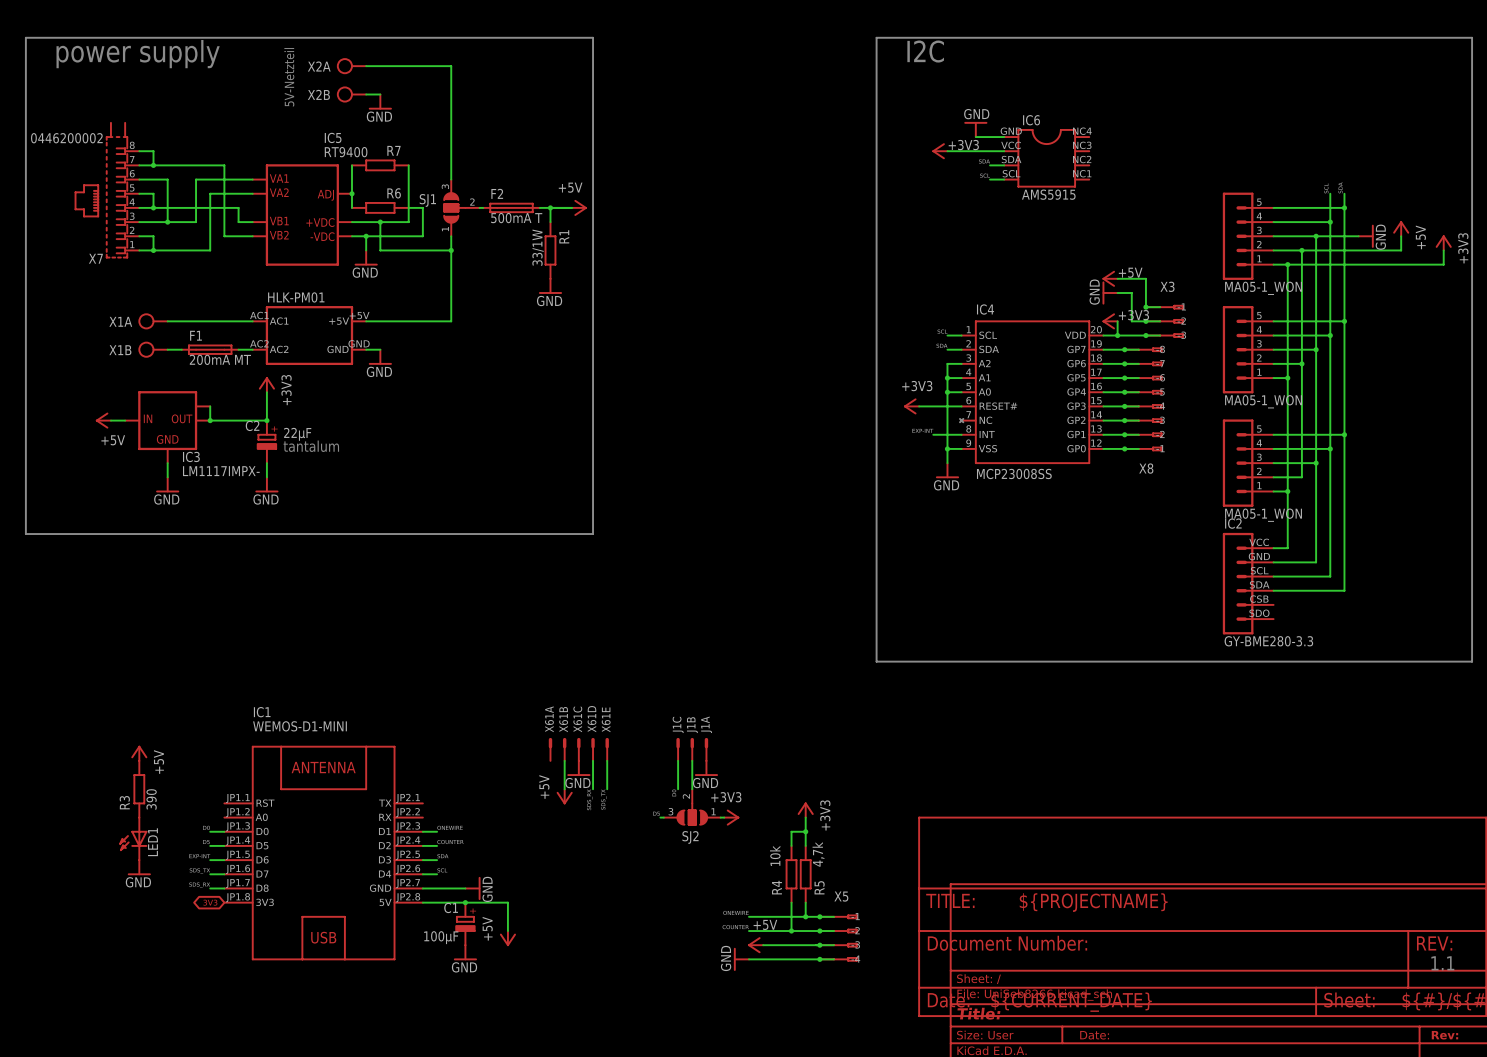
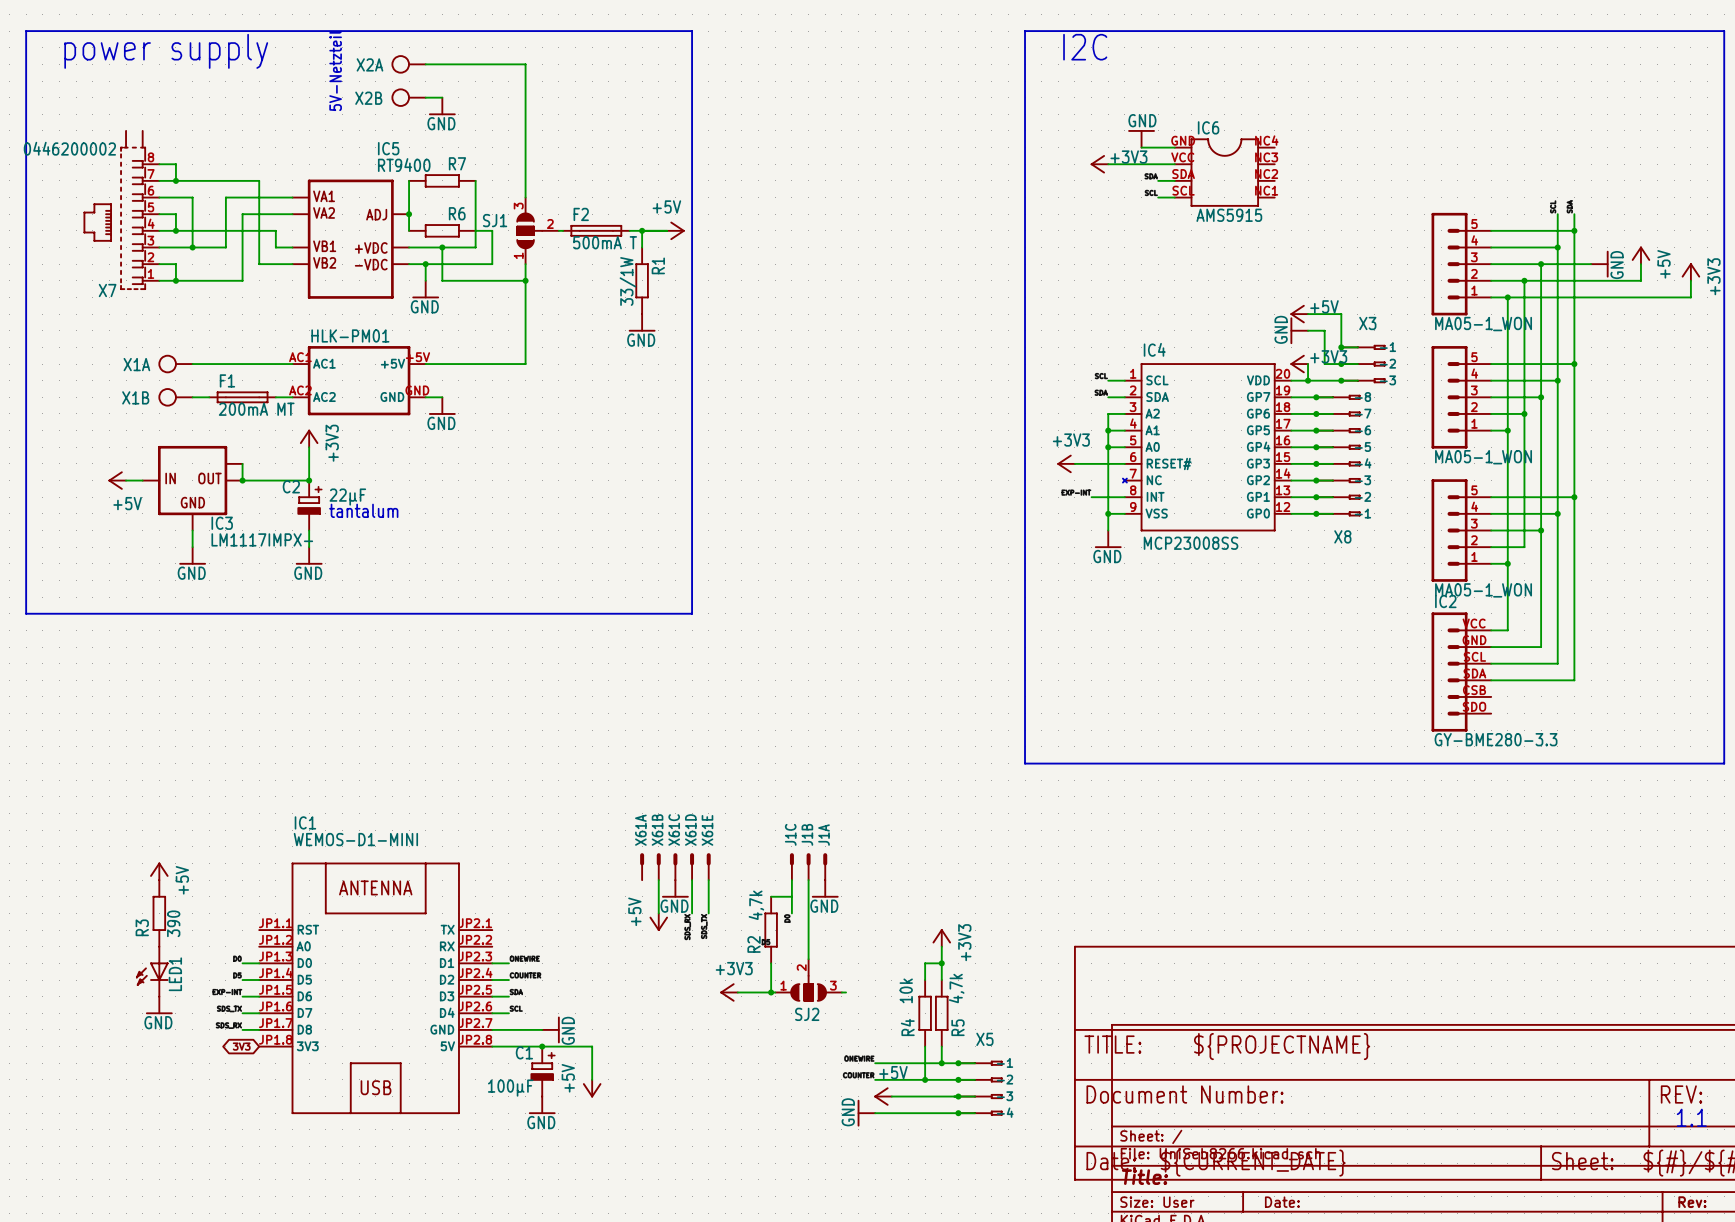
wire: none -> (771, 896) (791, 896)
R2: none -> 4,7k (771, 930)
SJ2 position: (692, 807) -> (808, 980)
SJ2 flip: as is (692, 814) -> left-right (808, 988)
wire: (720, 817) (724, 817) -> (841, 992) (846, 992)
power symbol position: +3V3 (731, 817) -> +3V3 (729, 992)
power symbol rotation: 0° (733, 817) -> 180° (727, 992)
wire: none -> (771, 963) (771, 992)
wire: none -> (737, 992) (775, 992)
junction: none -> (771, 992)

